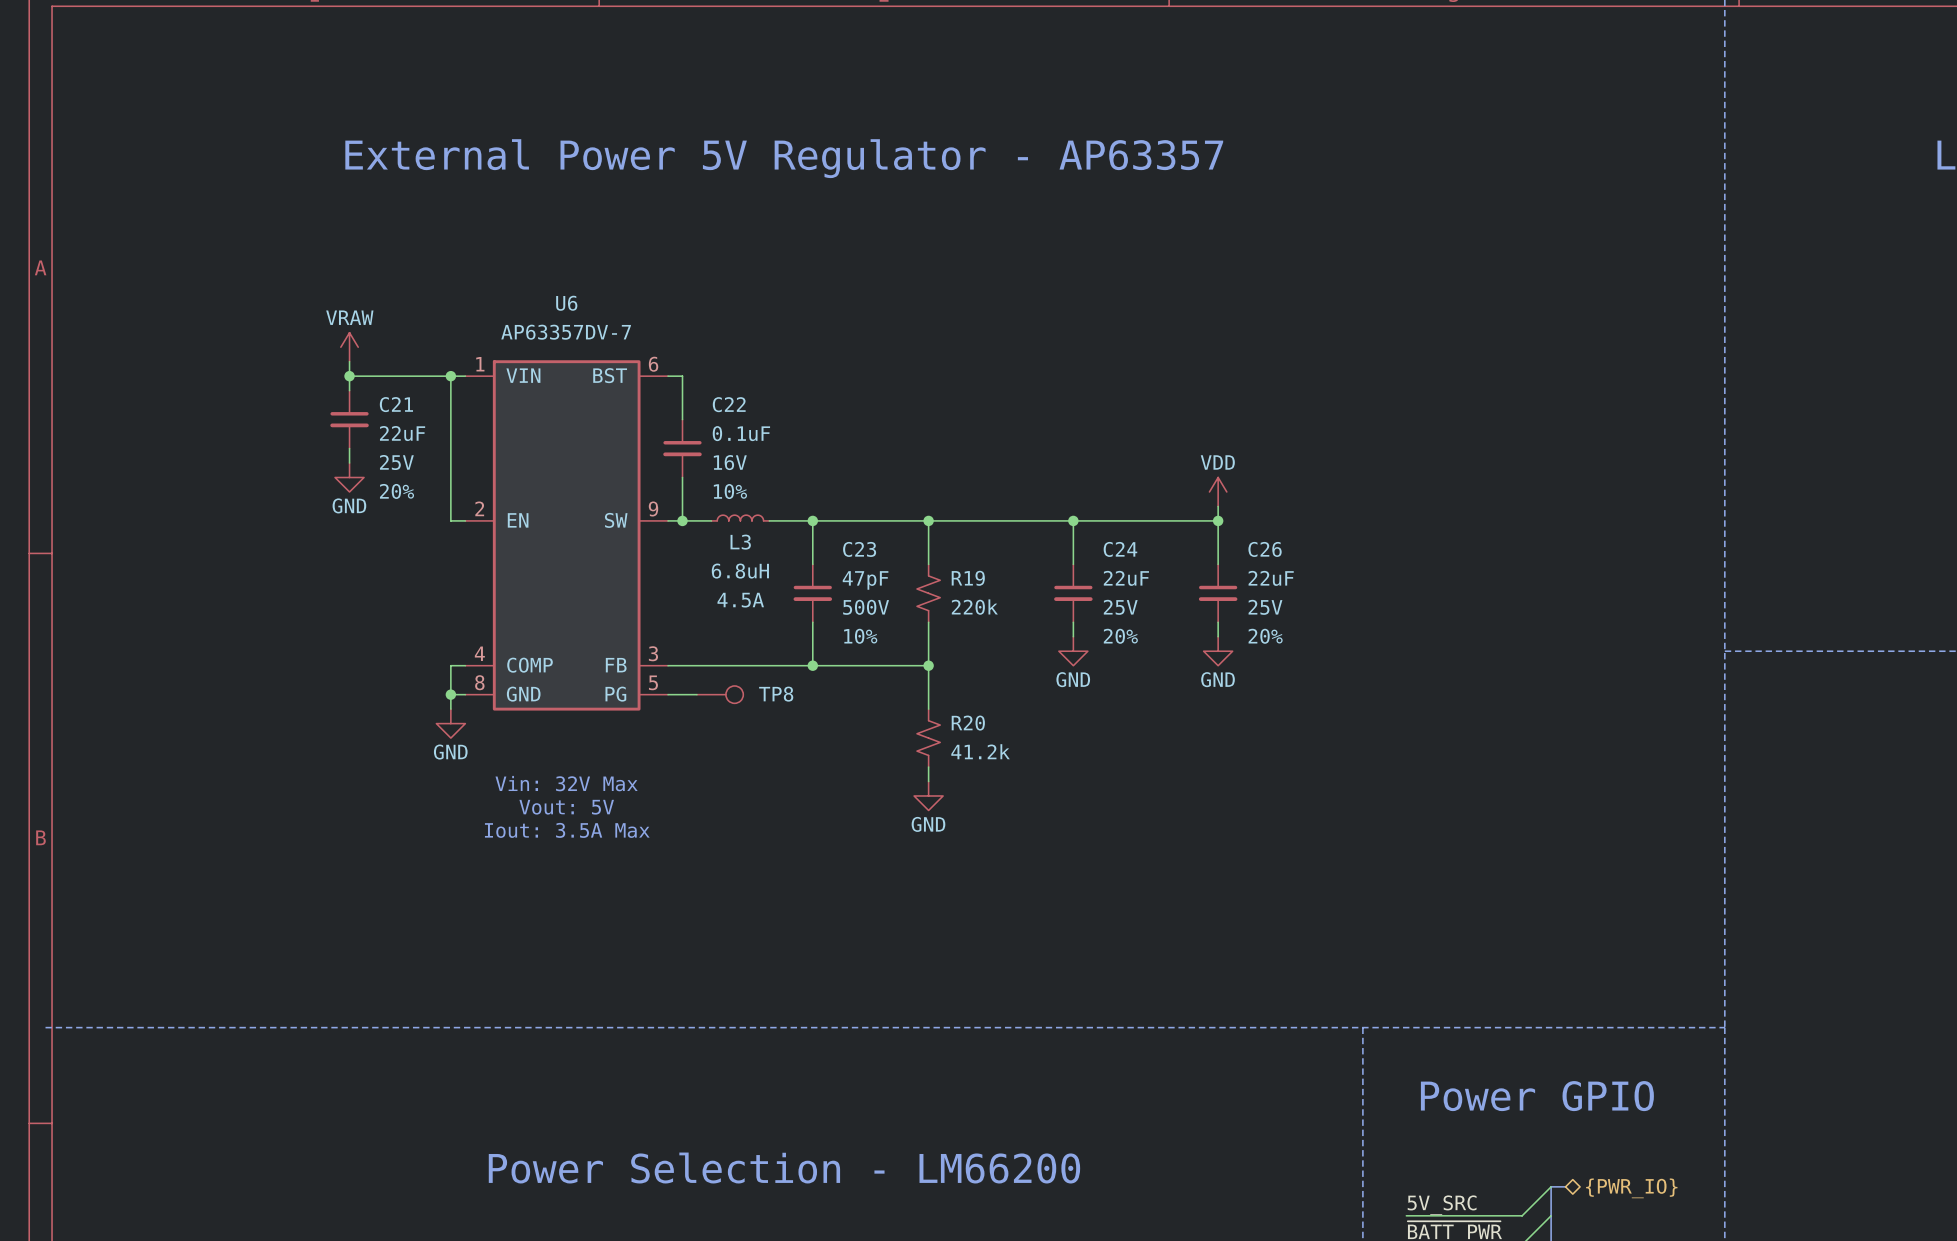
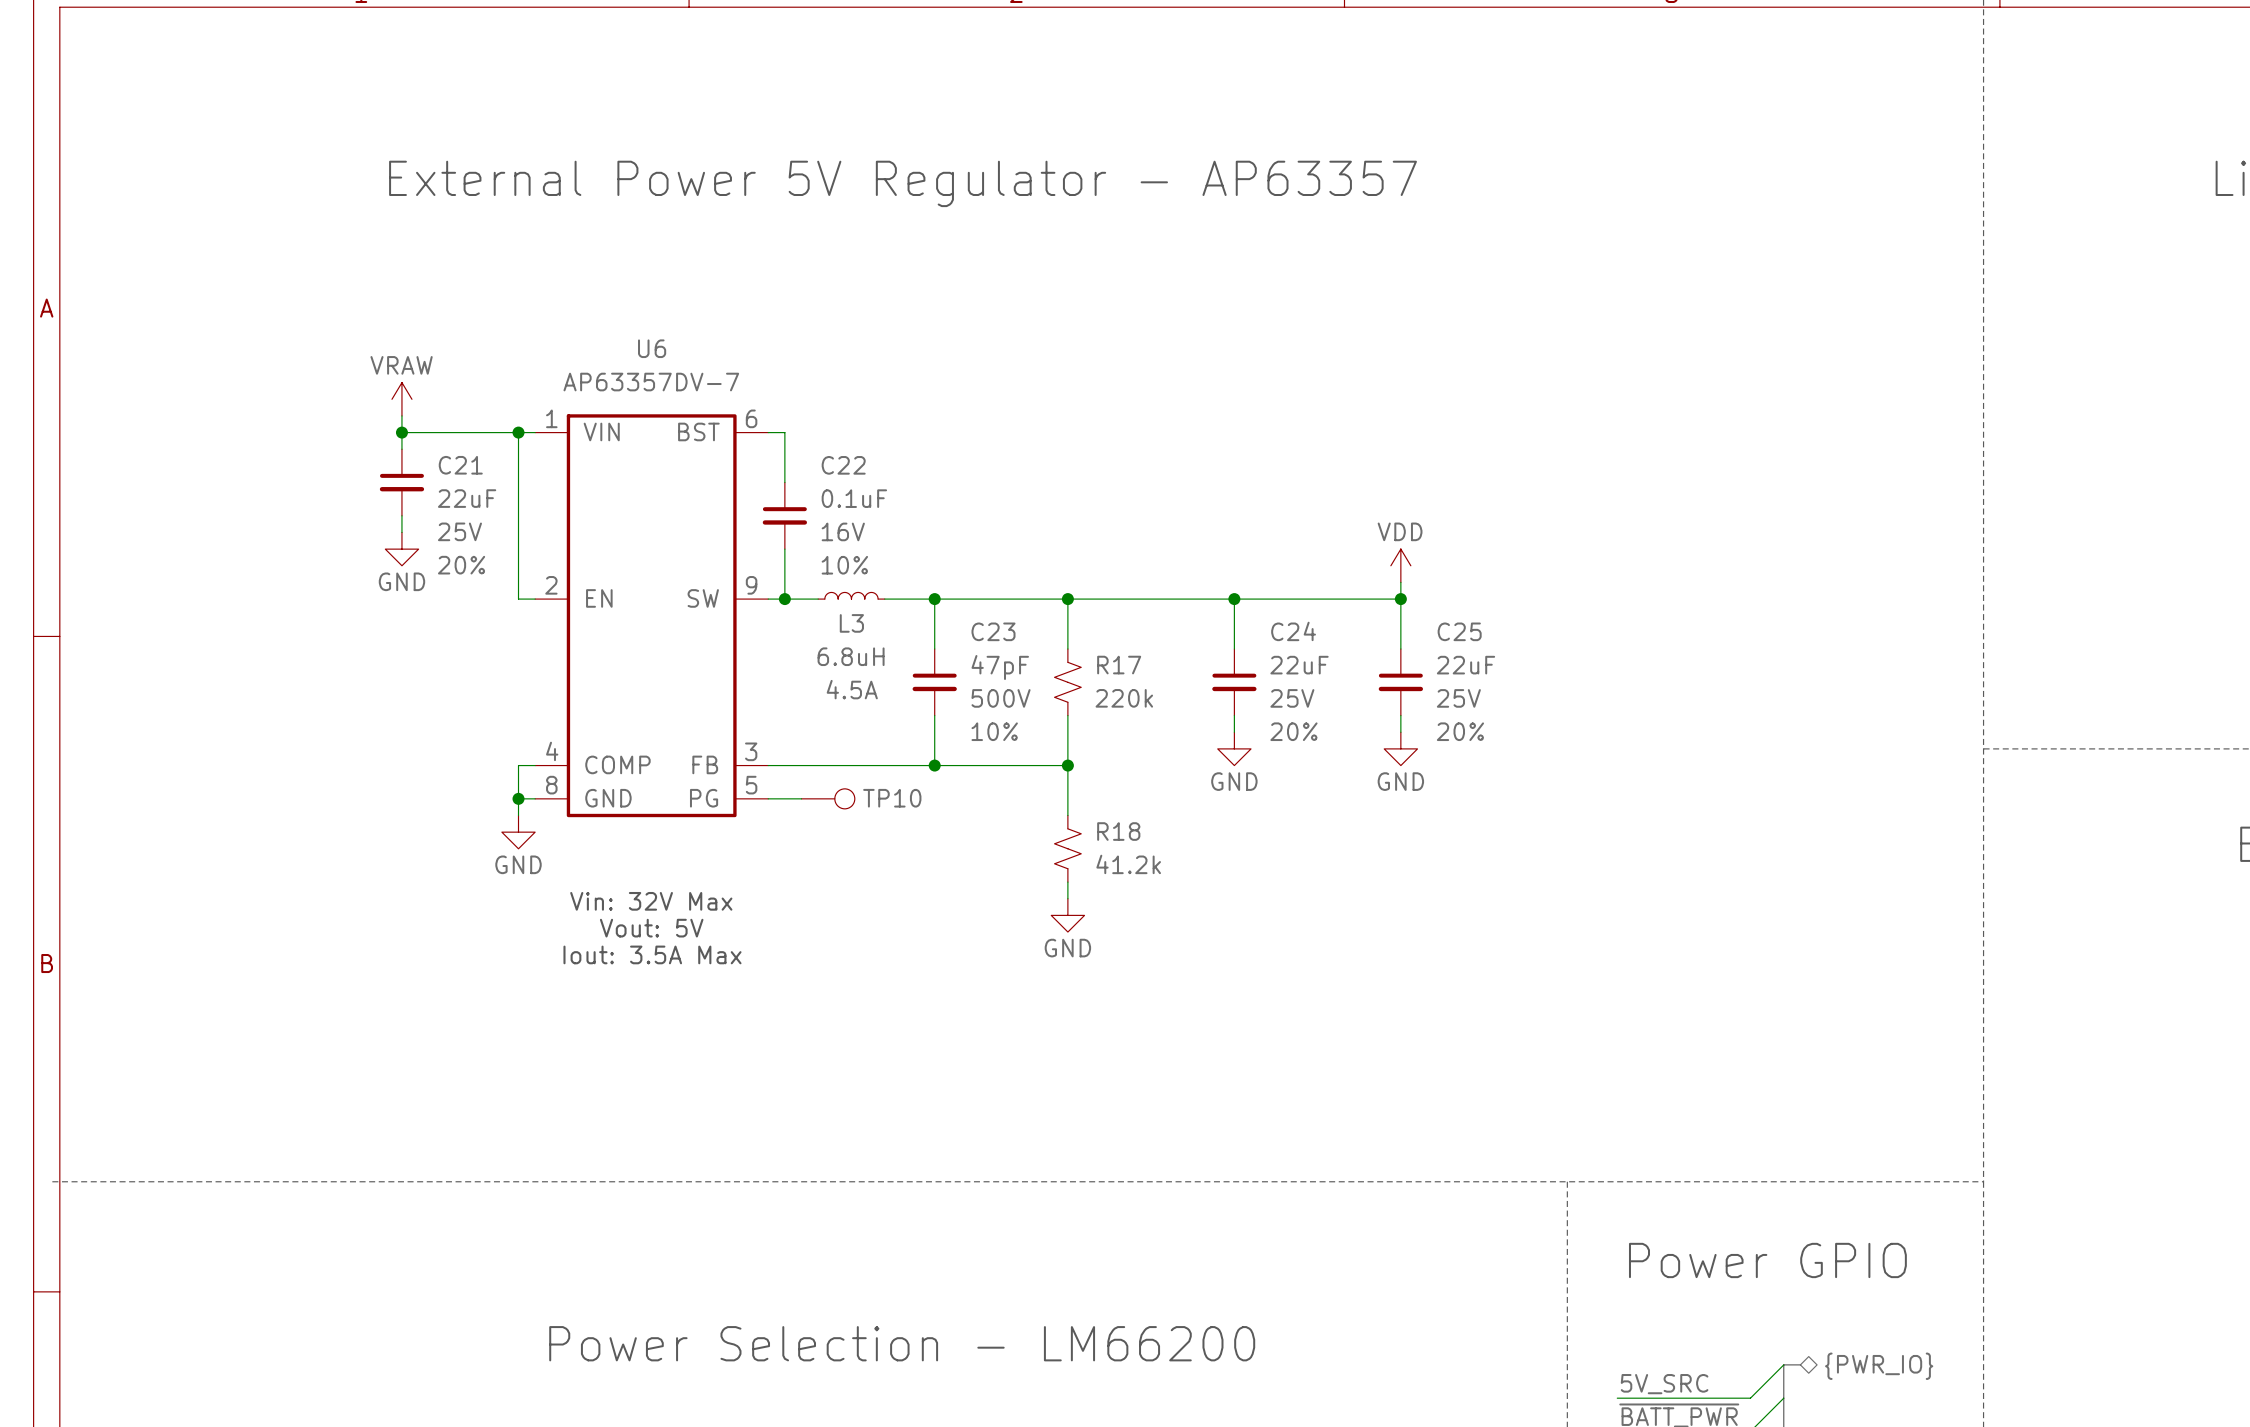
C26 name: C26 (1265, 549) -> C25 (1459, 631)
R19 name: R19 (968, 578) -> R17 (1119, 665)
TP8 name: TP8 (776, 694) -> TP10 (892, 798)
R20 name: R20 (968, 723) -> R18 (1118, 831)

